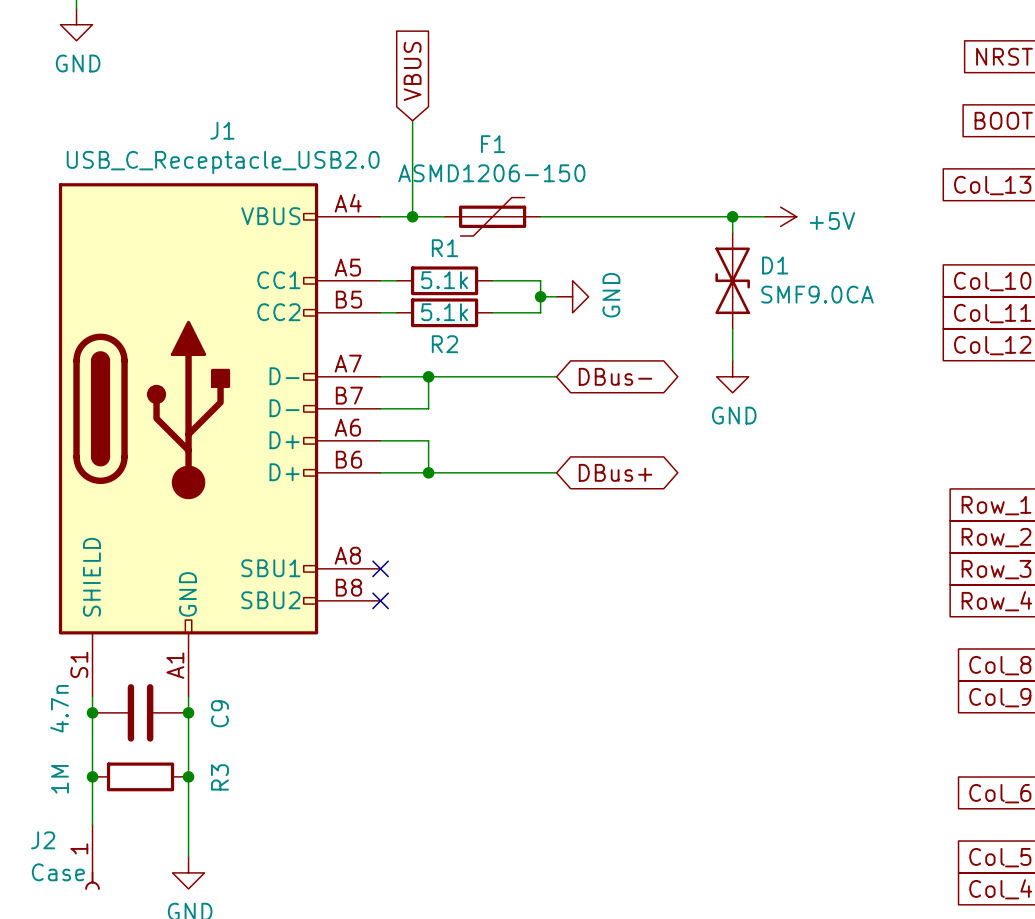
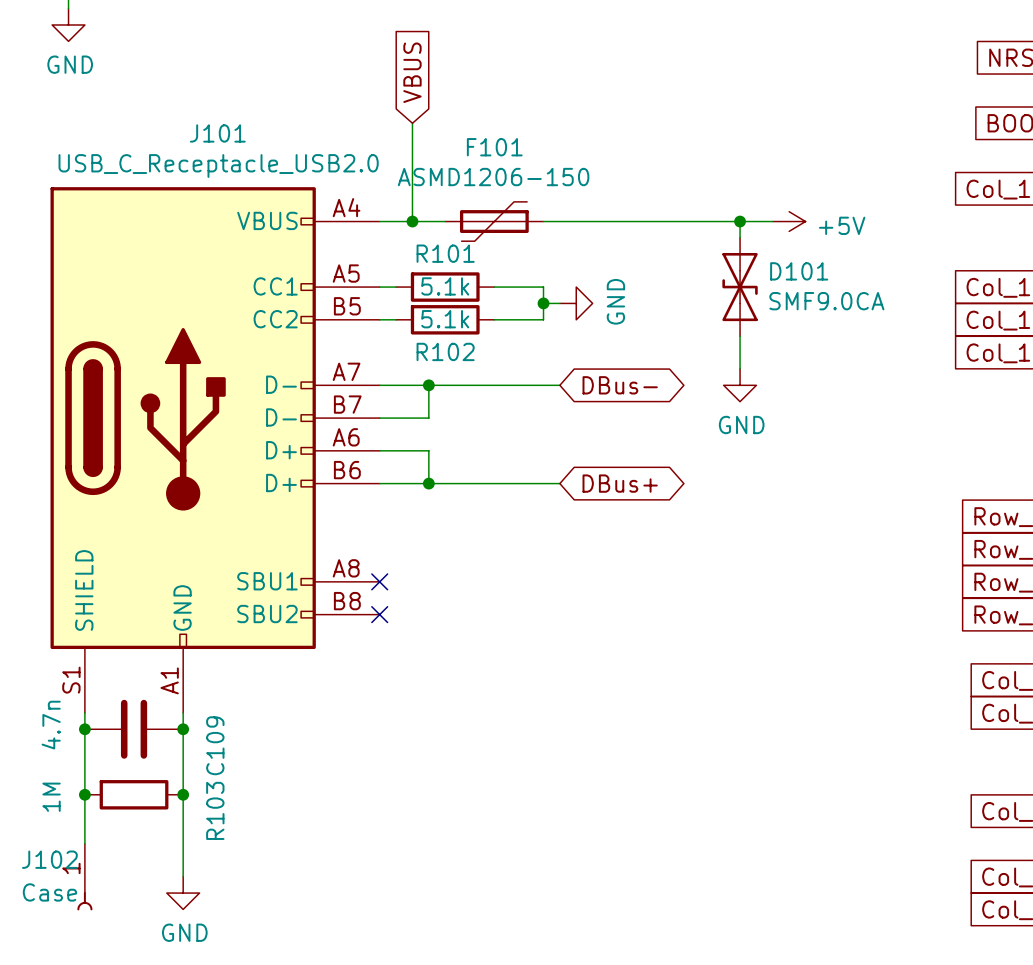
J1 name: J1 (222, 130) -> J101 (217, 133)
F1 name: F1 (492, 144) -> F101 (494, 147)
R1 name: R1 (444, 248) -> R101 (445, 253)
D1 name: D1 (775, 265) -> D101 (799, 271)
R2 name: R2 (444, 344) -> R102 (445, 351)
C9 name: C9 (219, 713) -> C109 (215, 745)
R3 name: R3 (219, 777) -> R103 (215, 810)
J2 name: J2 (43, 840) -> J102 (49, 859)

